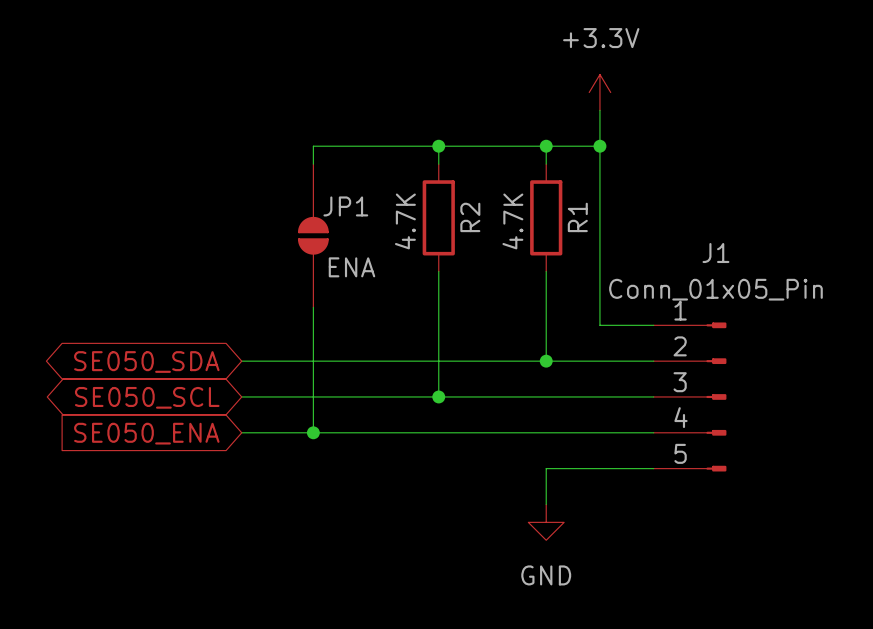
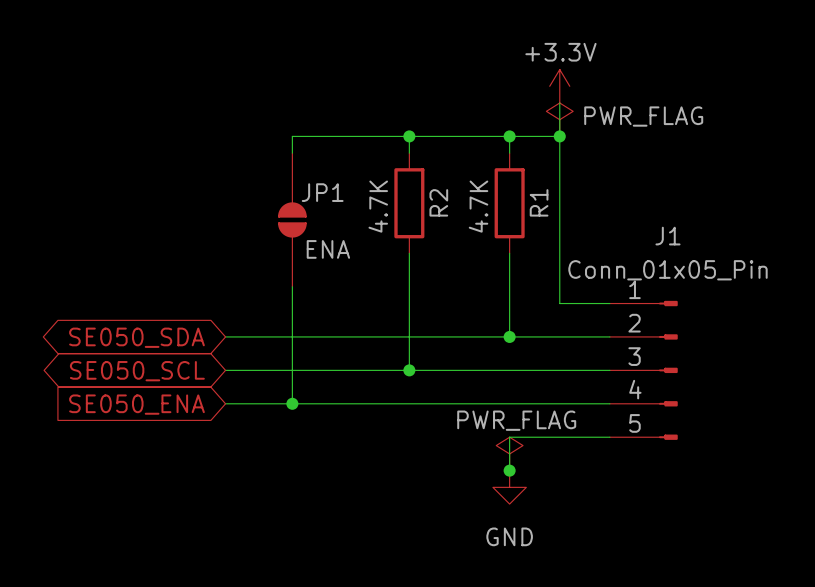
power symbol text position: +3.3V (601, 38) -> +3.3V (560, 52)
power symbol: none -> PWR_FLAG (559, 119)
power symbol: none -> PWR_FLAG (509, 453)
junction: none -> (509, 470)

